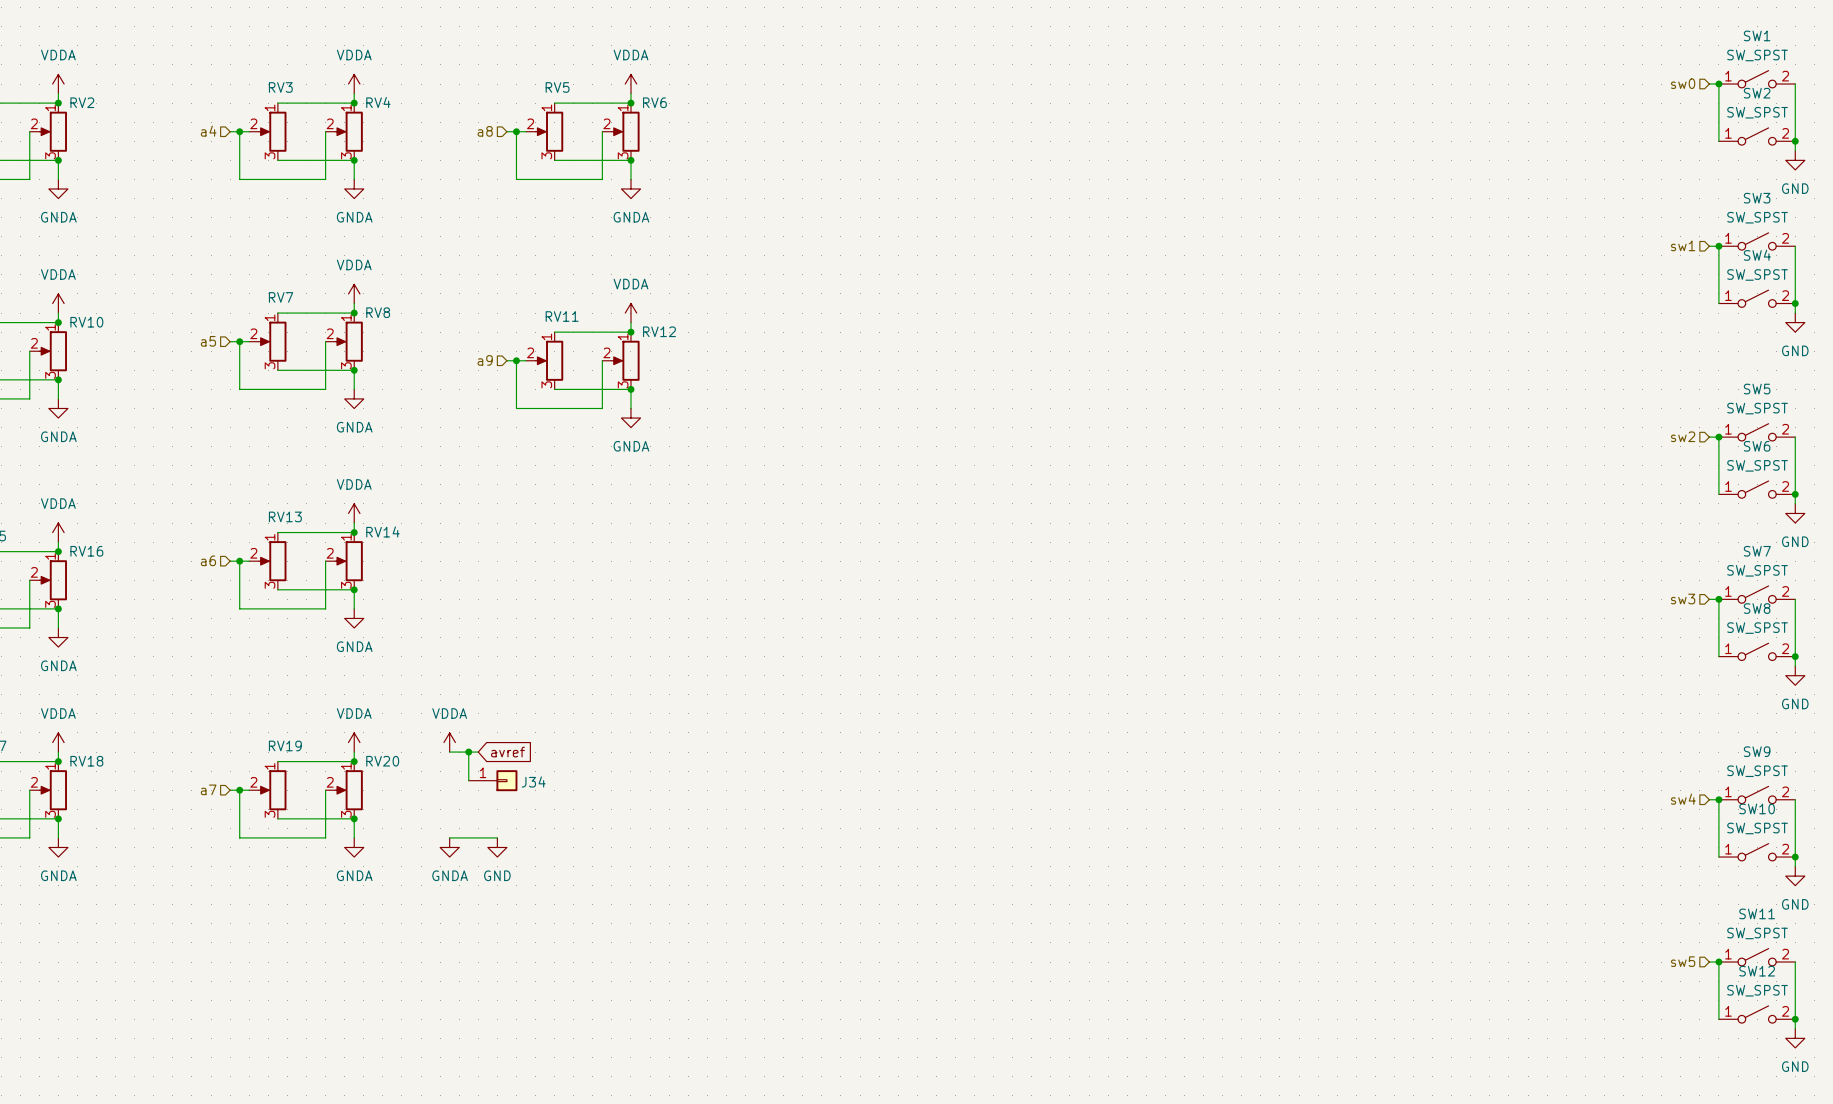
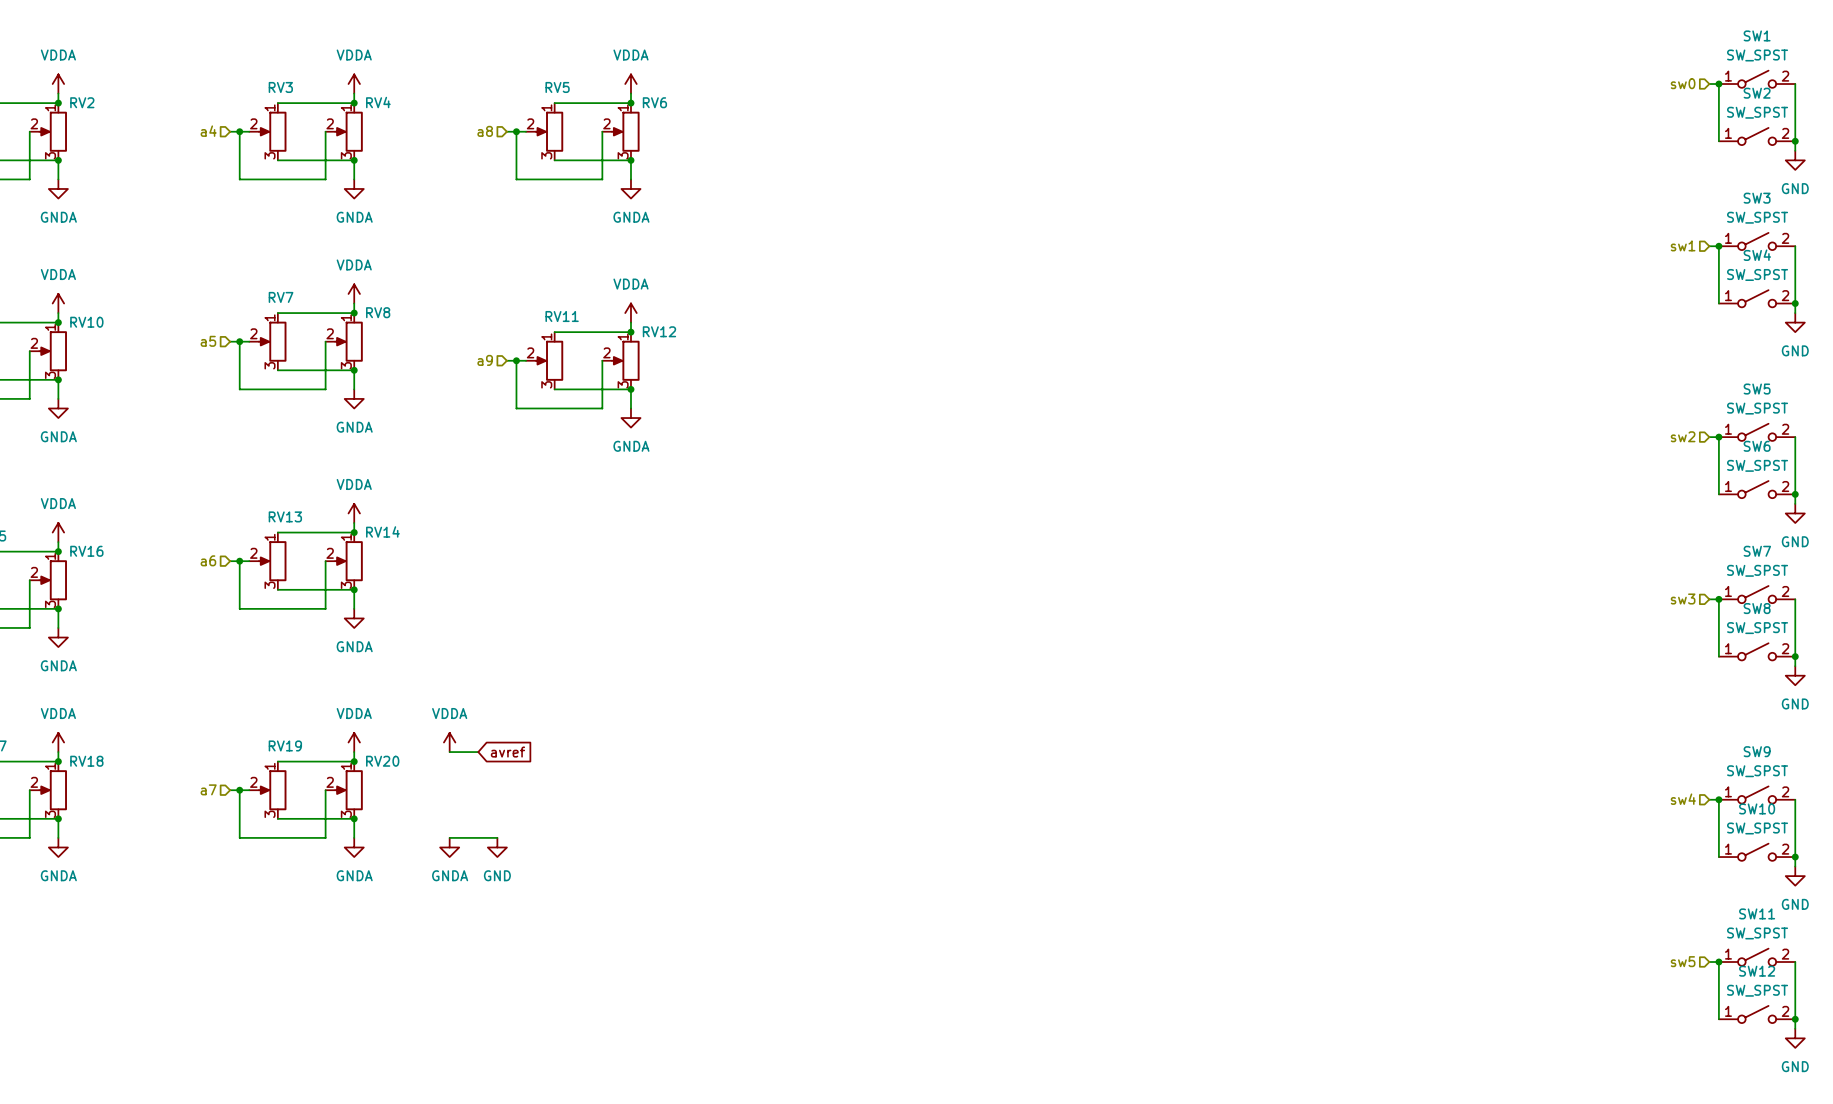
wire: (468, 752) (468, 780) -> none
junction: (468, 752) -> none
J34: (493, 780) -> none

